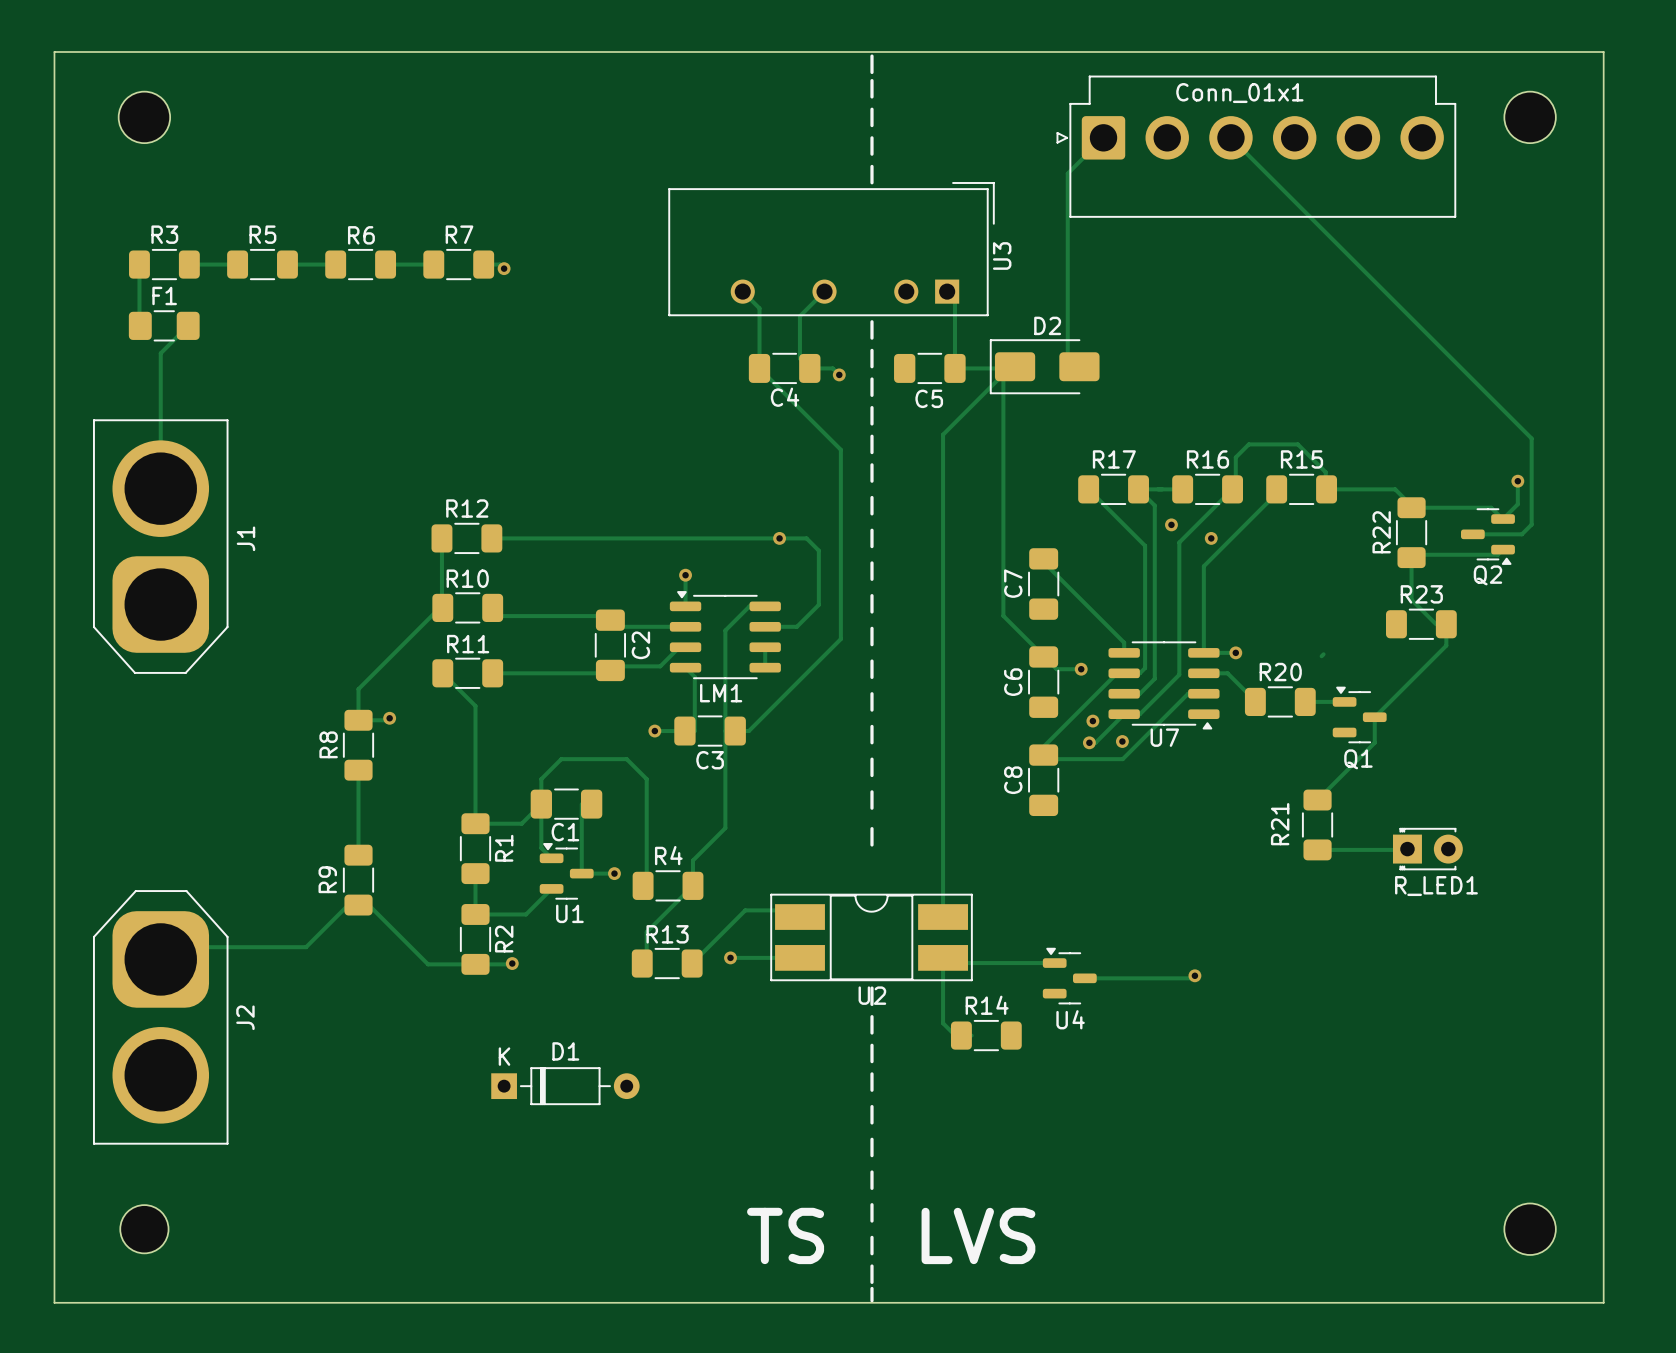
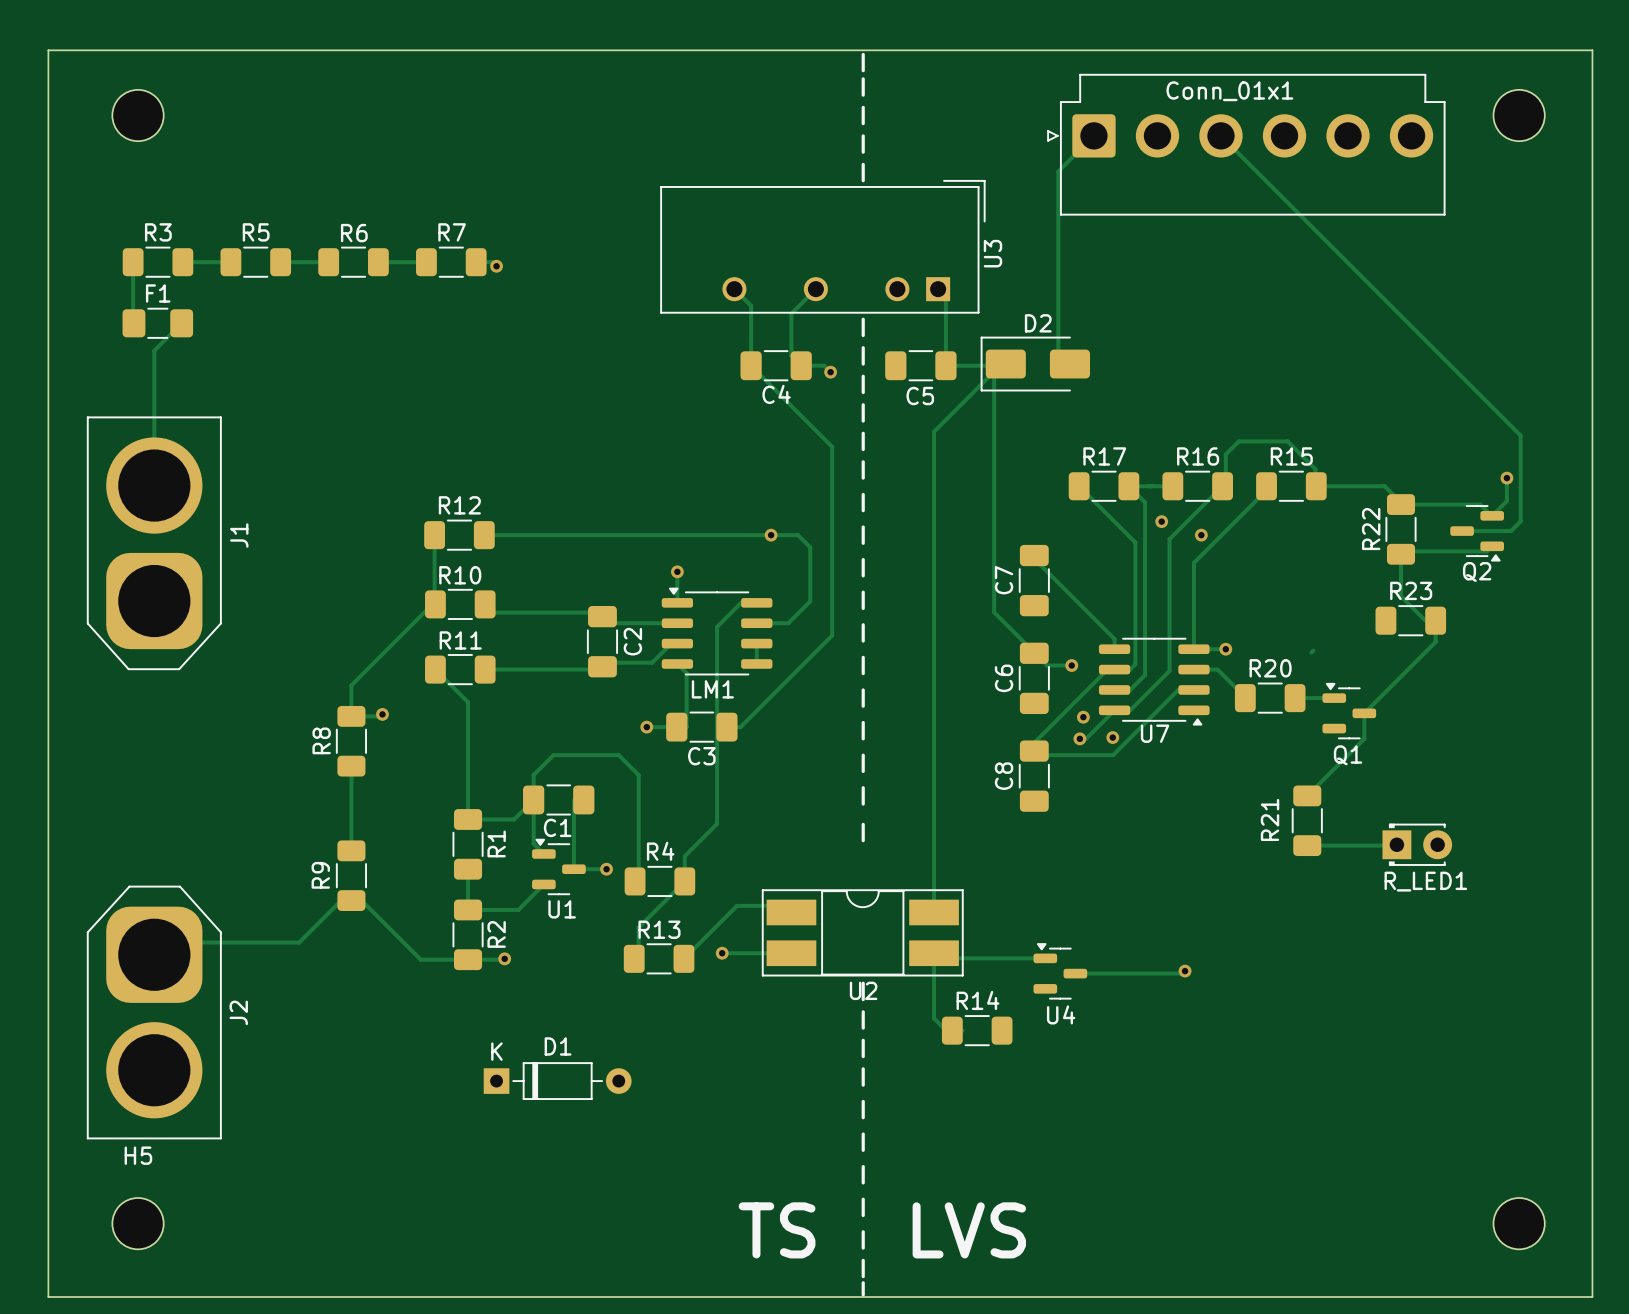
part: (144, 1229) -> none
H5: none -> (138, 1223)

